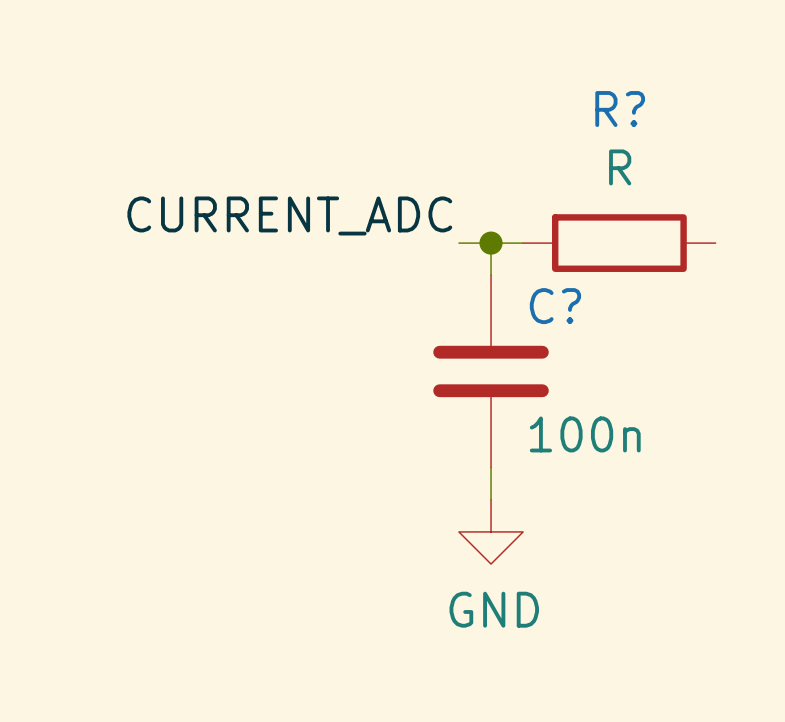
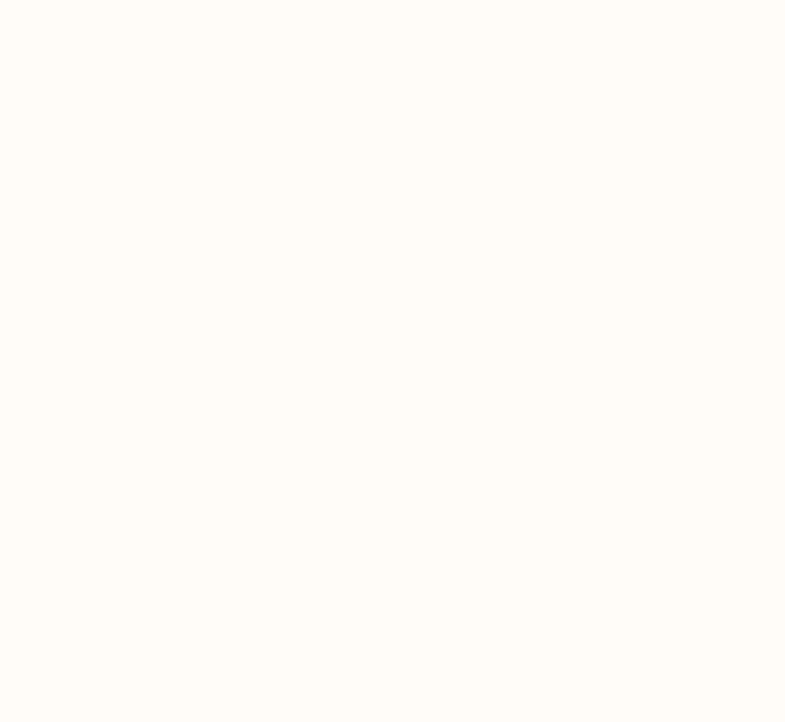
label: CURRENT_ADC (289, 215) -> none
wire: (458, 243) (523, 243) -> none
wire: (491, 243) (491, 275) -> none
junction: (491, 243) -> none
R?: R (619, 243) -> none
C?: 100n (491, 371) -> none
wire: (491, 467) (491, 499) -> none
power symbol: GND (491, 531) -> none

